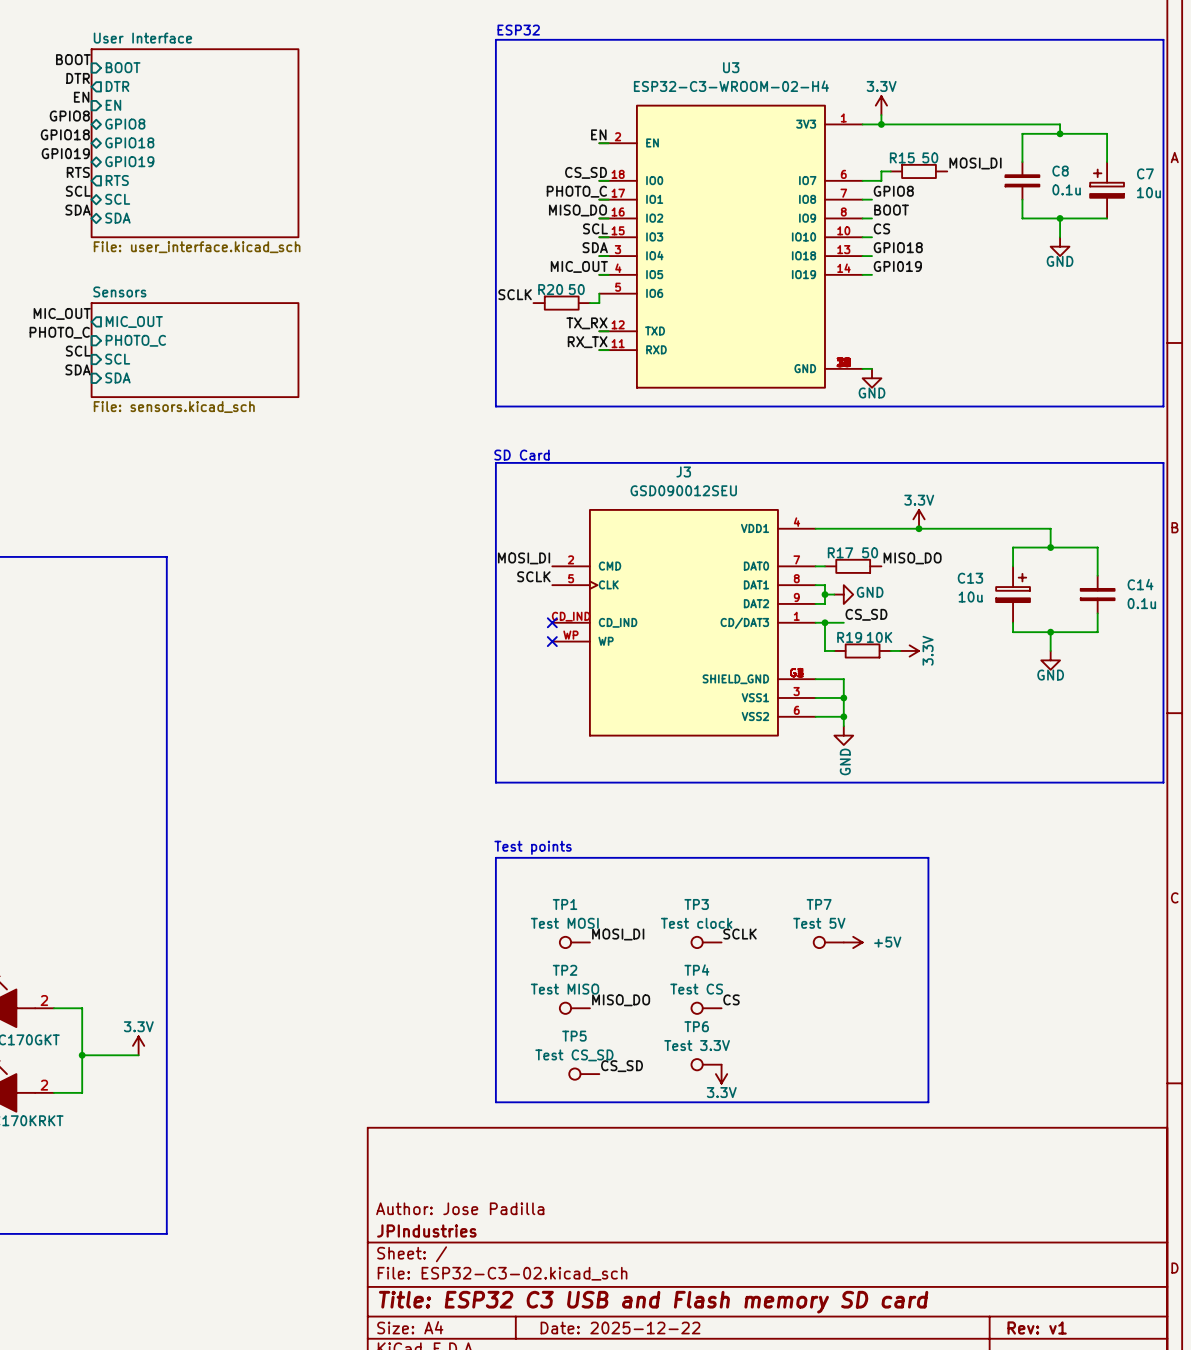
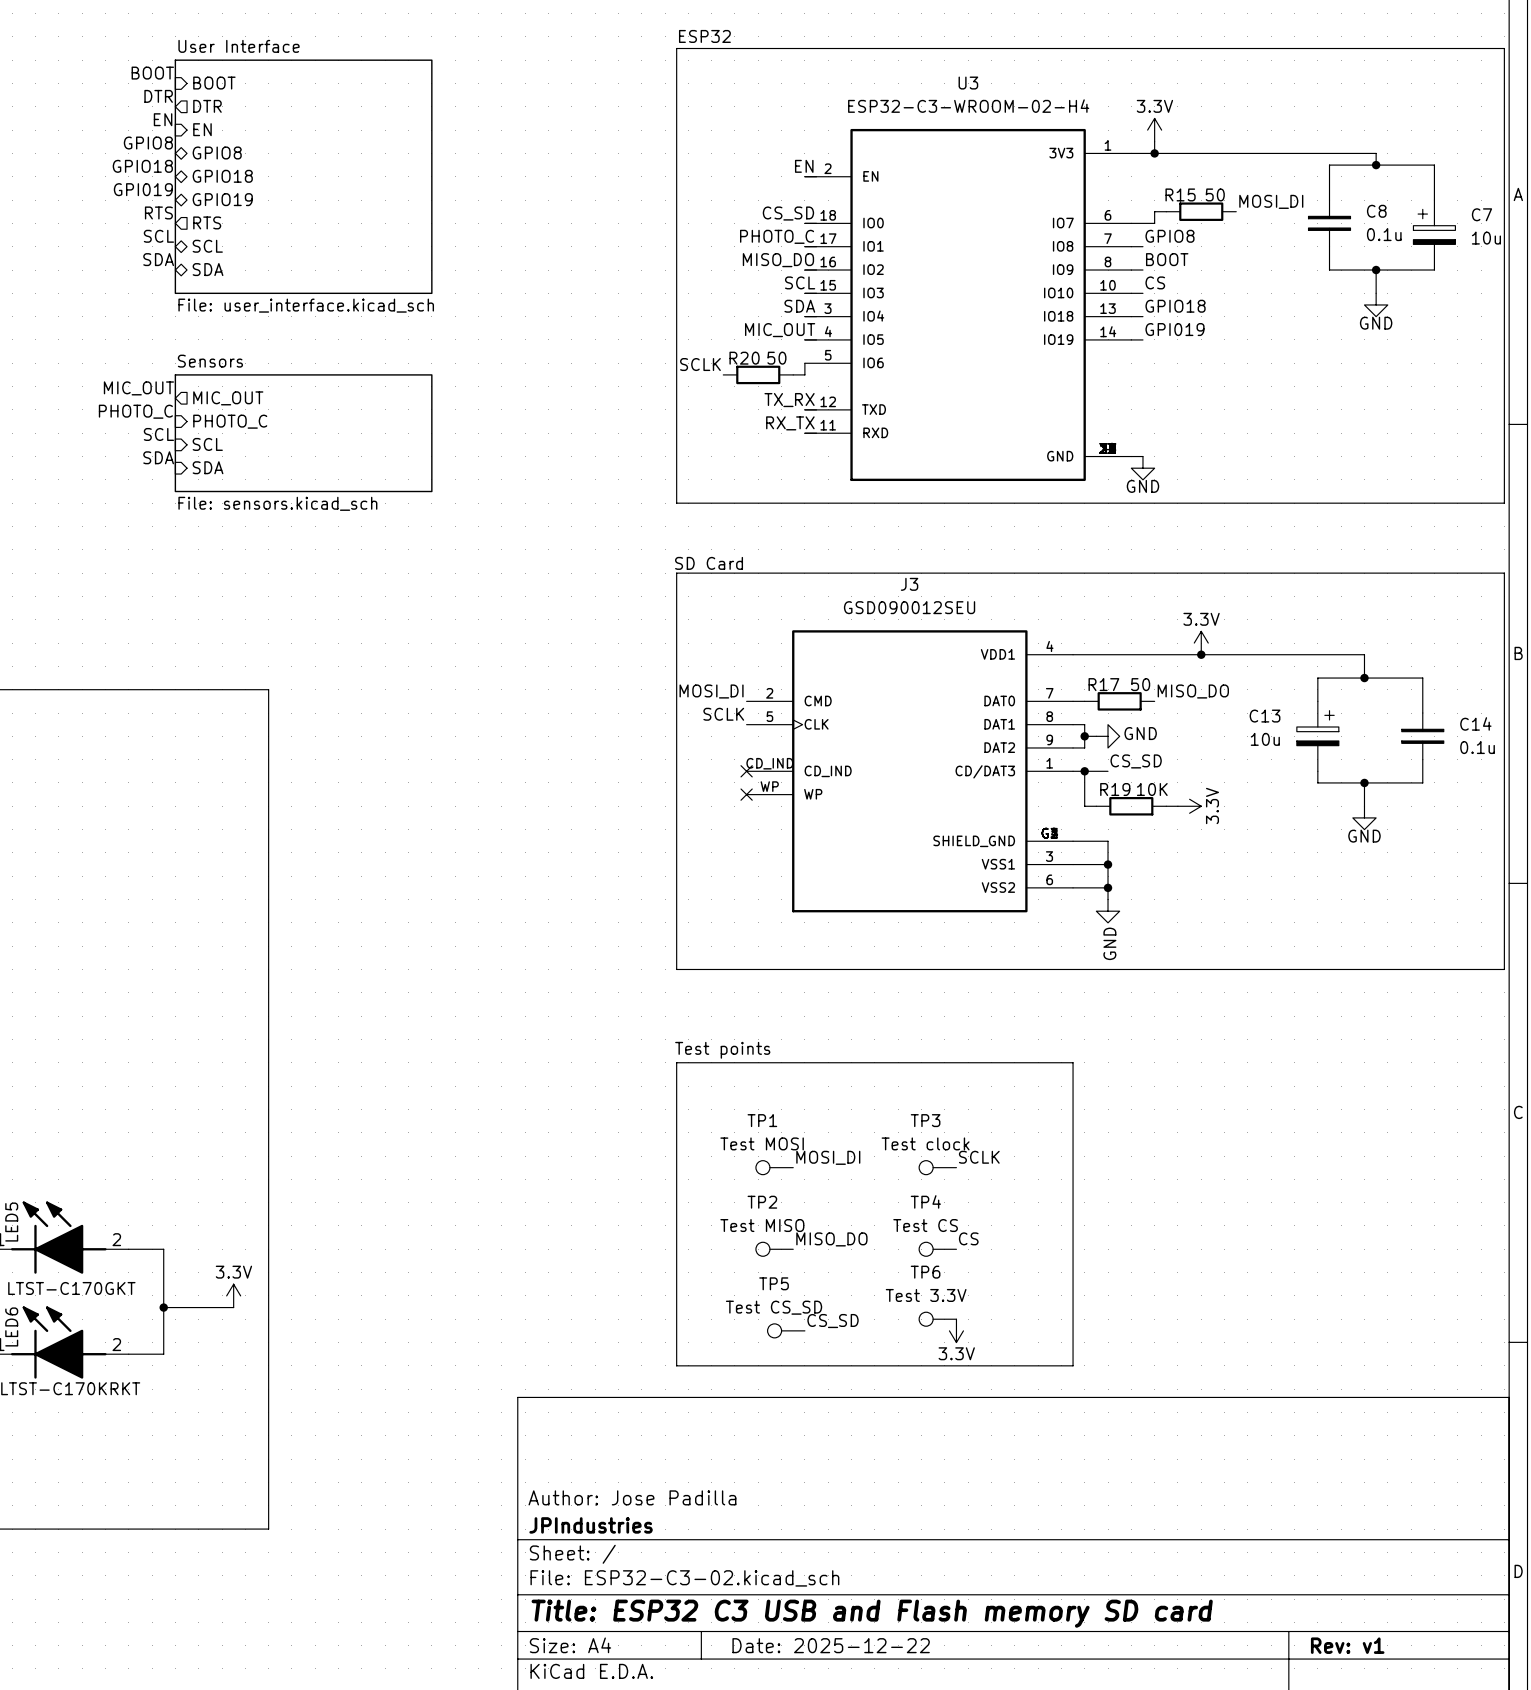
line: (815, 857) (928, 857) (928, 1102) (815, 1102) -> (1073, 1062) (1073, 1365)
TP7: Test 5V (828, 942) -> none
power symbol: +5V (853, 942) -> none

